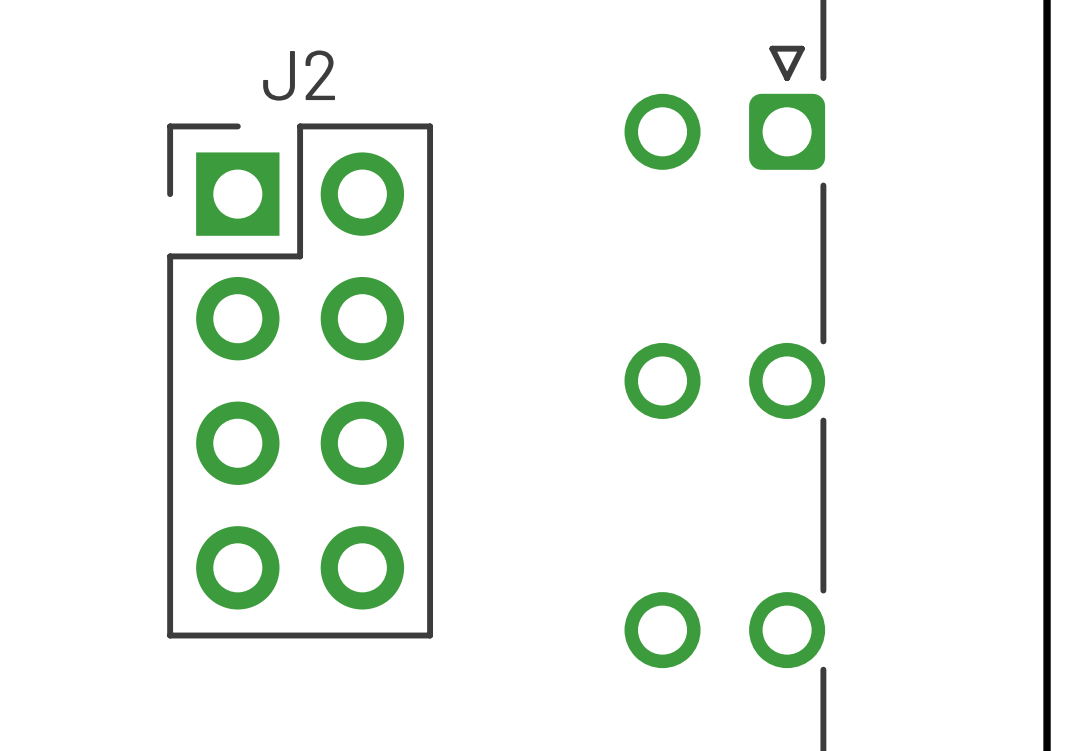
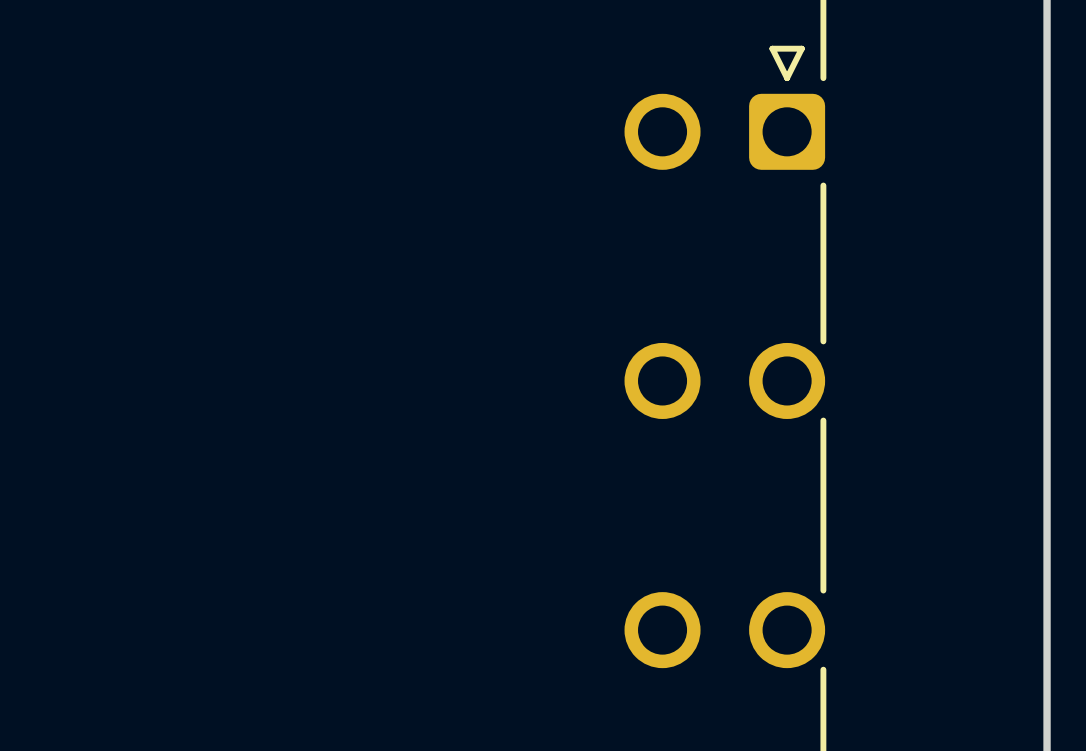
J2: (300, 380) -> none

